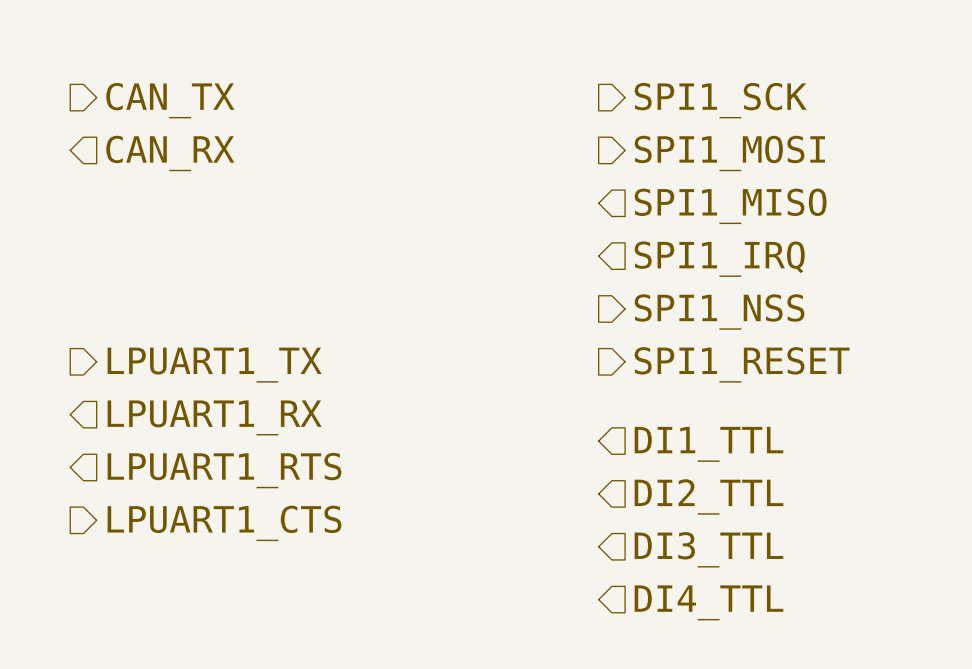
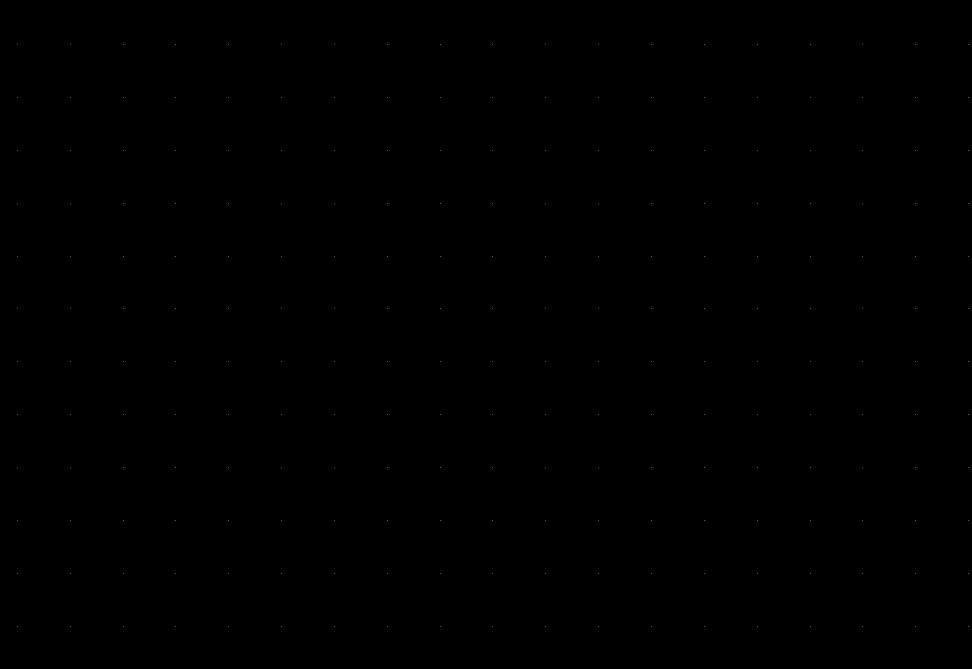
hierarchical label: CAN_TX (170, 100) -> none
hierarchical label: SPI1_SCK (720, 100) -> none
hierarchical label: CAN_RX (170, 153) -> none
hierarchical label: SPI1_MOSI (729, 153) -> none
hierarchical label: SPI1_MISO (730, 206) -> none
hierarchical label: SPI1_IRQ (719, 259) -> none
hierarchical label: SPI1_NSS (719, 312) -> none
hierarchical label: SPI1_RESET (742, 364) -> none
hierarchical label: LPUART1_TX (214, 365) -> none
hierarchical label: LPUART1_RX (214, 417) -> none
hierarchical label: DI1_TTL (708, 444) -> none
hierarchical label: LPUART1_RTS (224, 470) -> none
hierarchical label: DI2_TTL (708, 496) -> none
hierarchical label: LPUART1_CTS (224, 523) -> none
hierarchical label: DI3_TTL (708, 549) -> none
hierarchical label: DI4_TTL (708, 602) -> none

